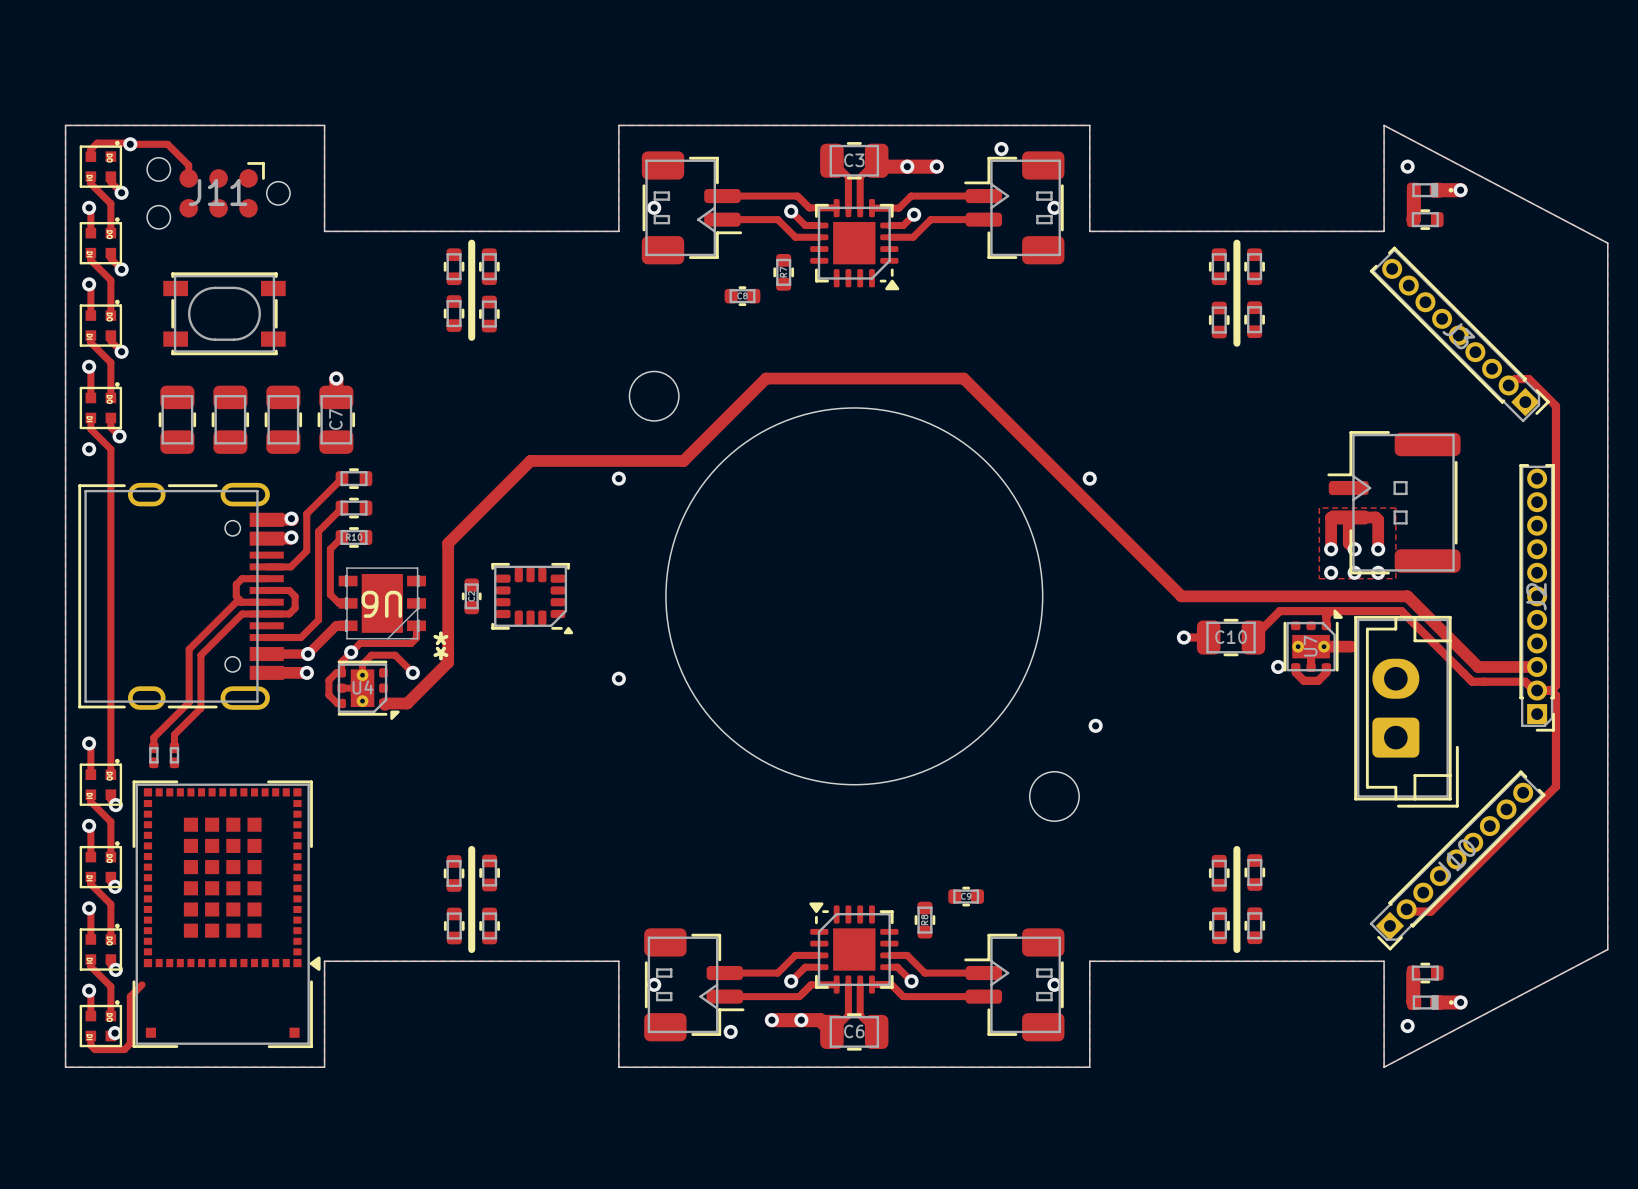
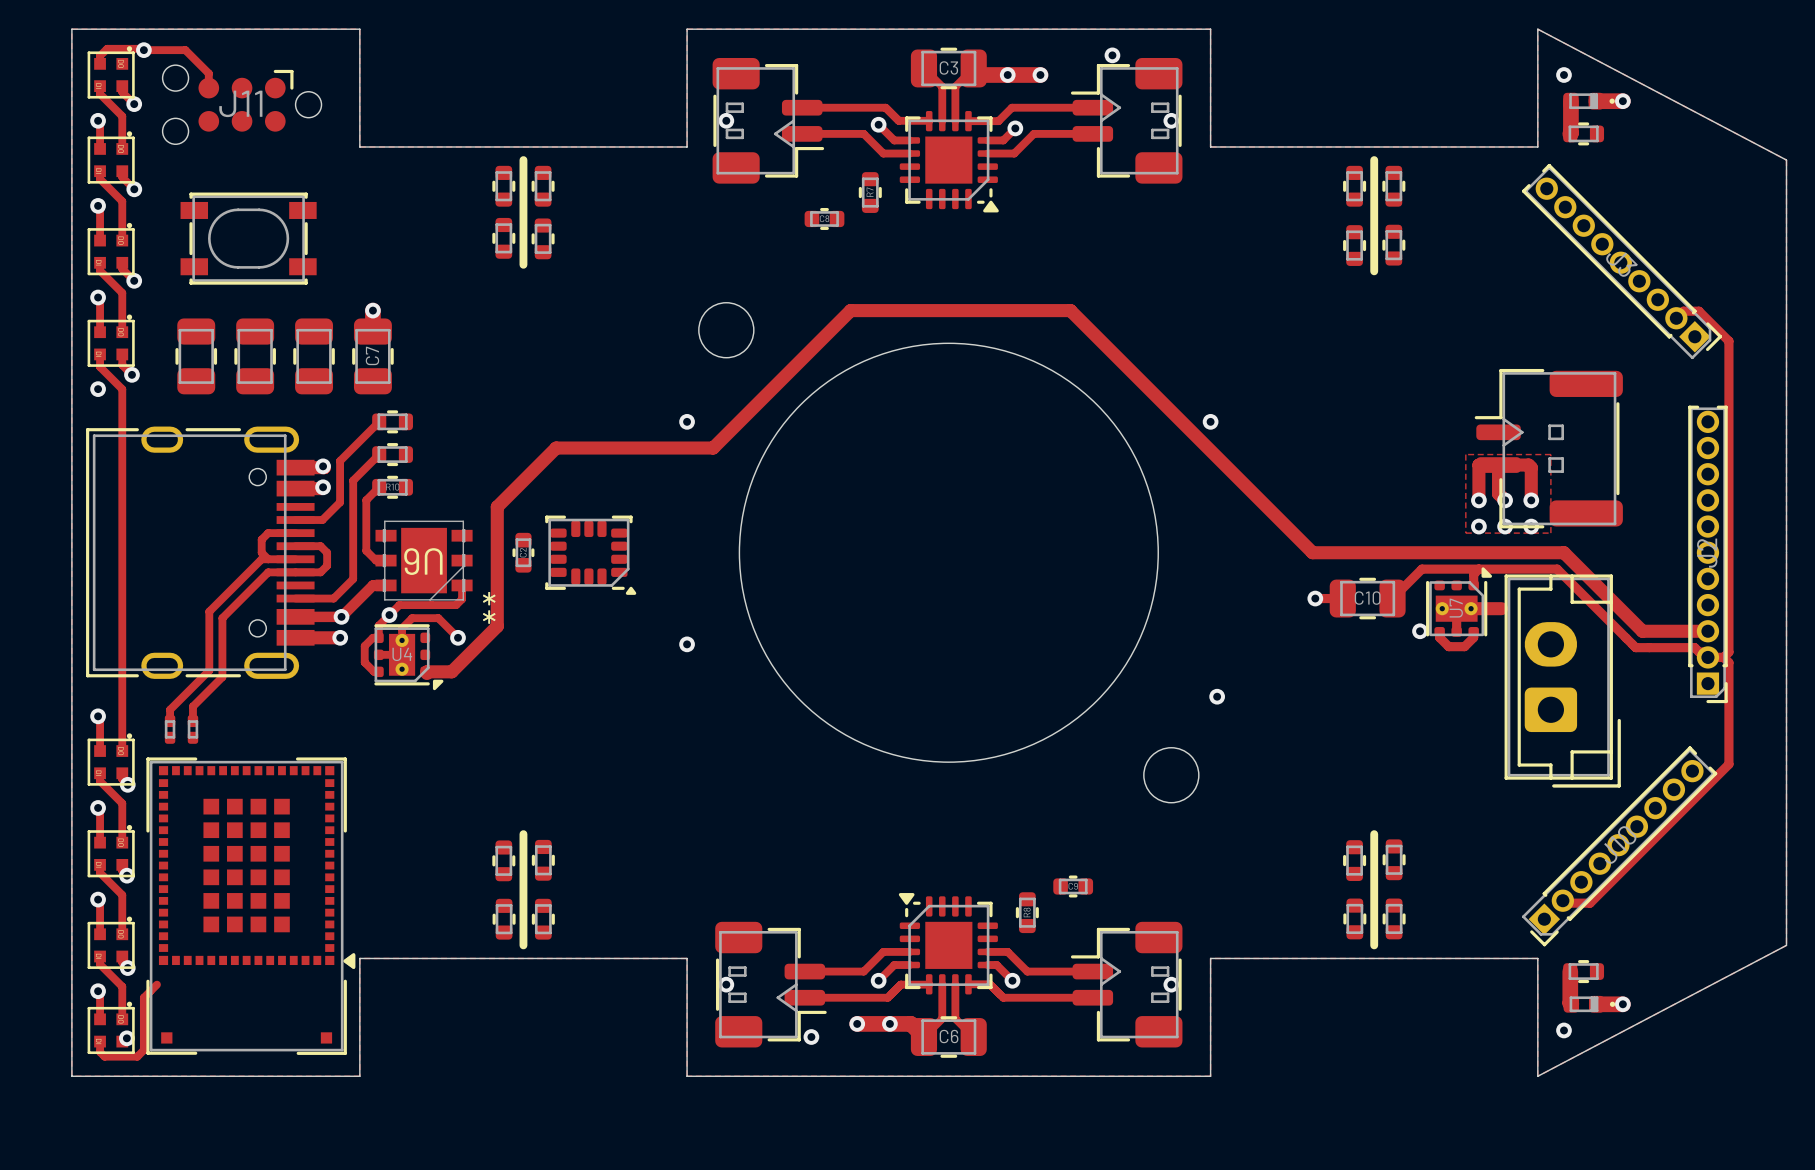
track: (683, 460) (530, 460) (448, 543) (448, 555) -> (759, 402) (713, 448) (556, 448) (497, 506)

